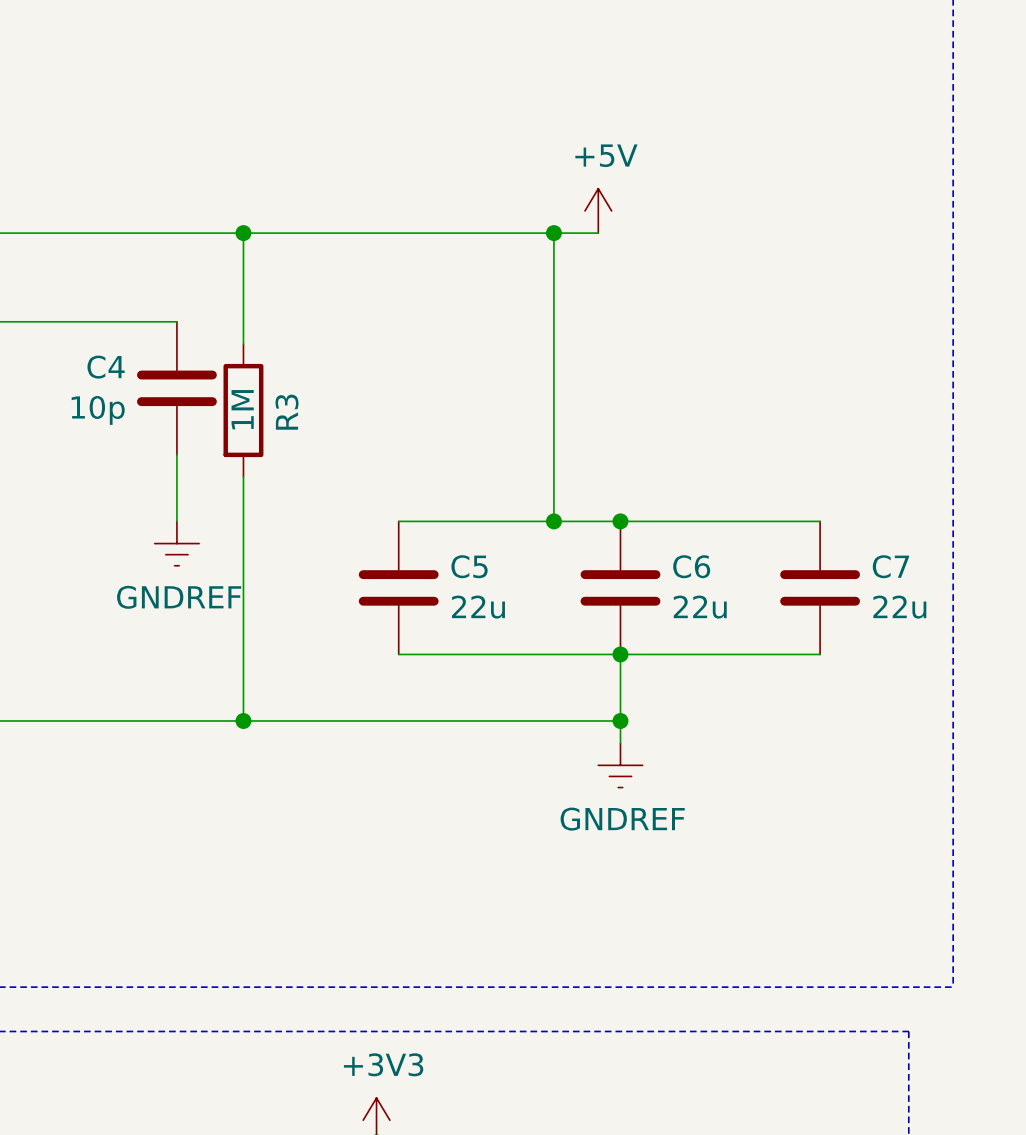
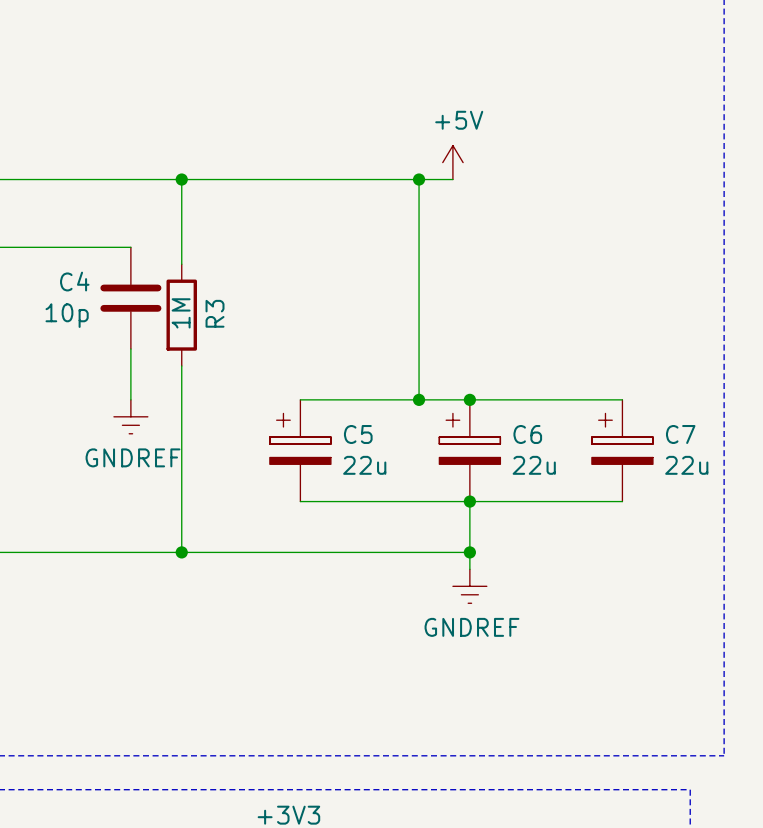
C5 symbol: [358, 521, 439, 655] -> [269, 399, 331, 502]
C6 symbol: [580, 521, 661, 655] -> [439, 399, 501, 502]
C7 symbol: [780, 521, 861, 655] -> [591, 399, 653, 502]

